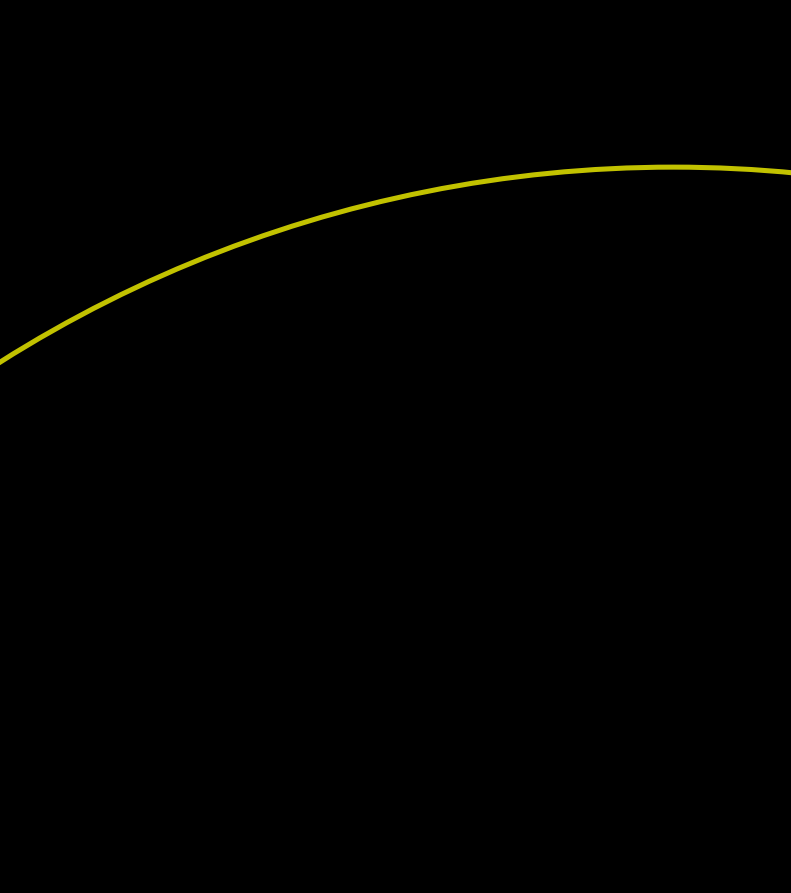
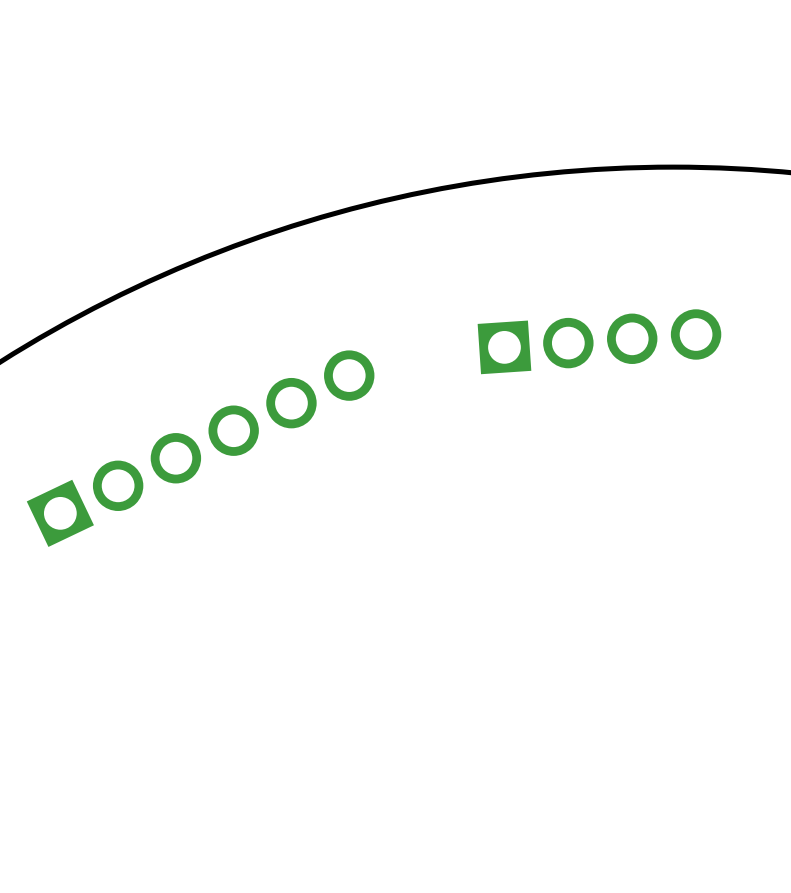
part: none -> (599, 341)
part: none -> (200, 448)

